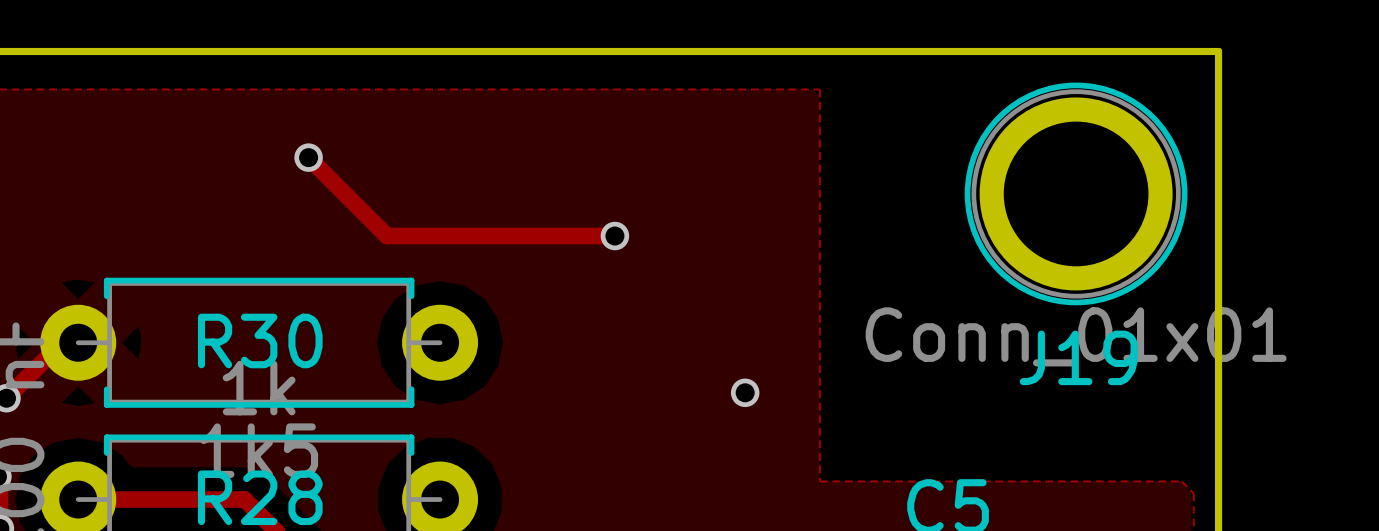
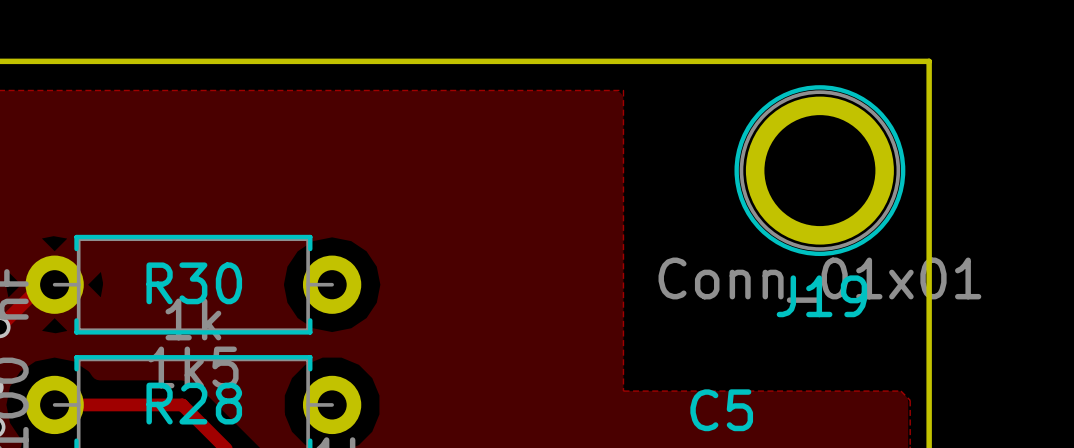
track: (308, 157) (386, 236) (614, 236) -> none
via: (308, 157) -> none
via: (614, 236) -> none
via: (745, 392) -> none

